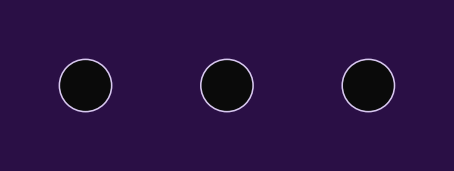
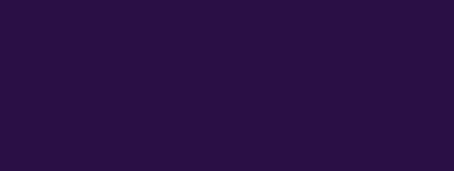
part: (85, 85) -> none
part: (226, 85) -> none
part: (368, 85) -> none

